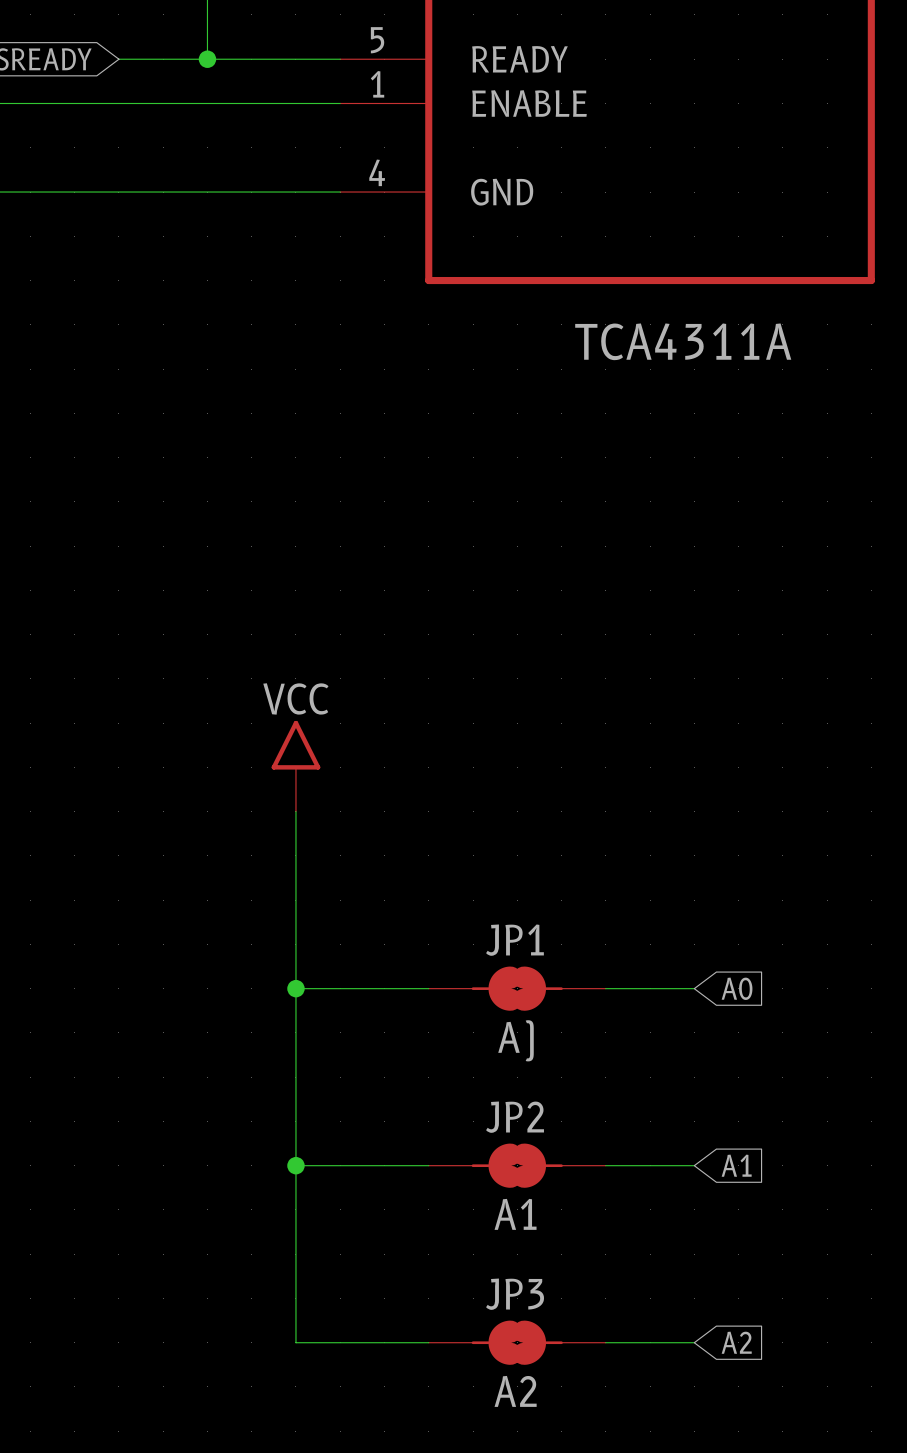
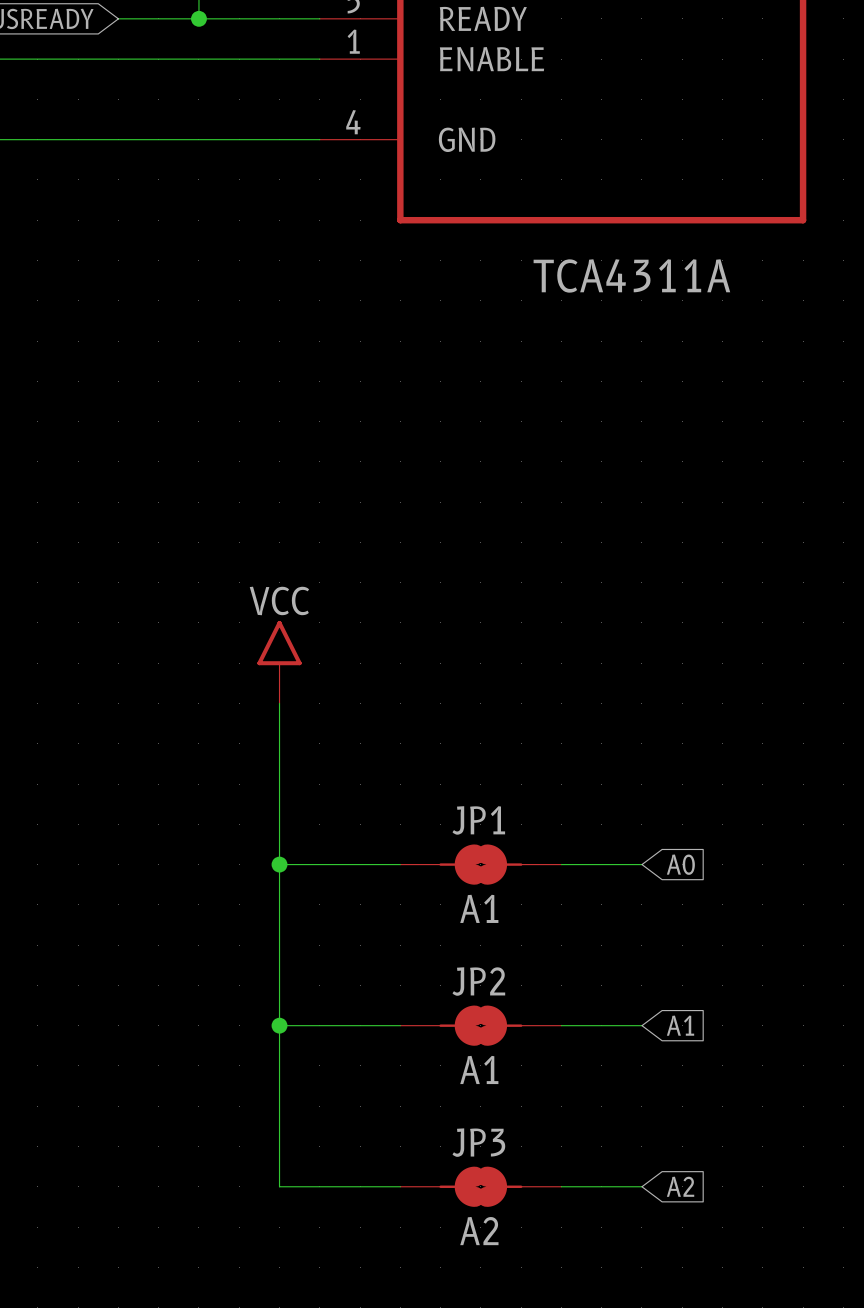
JP1 value: A) (515, 1040) -> A1 (479, 908)

